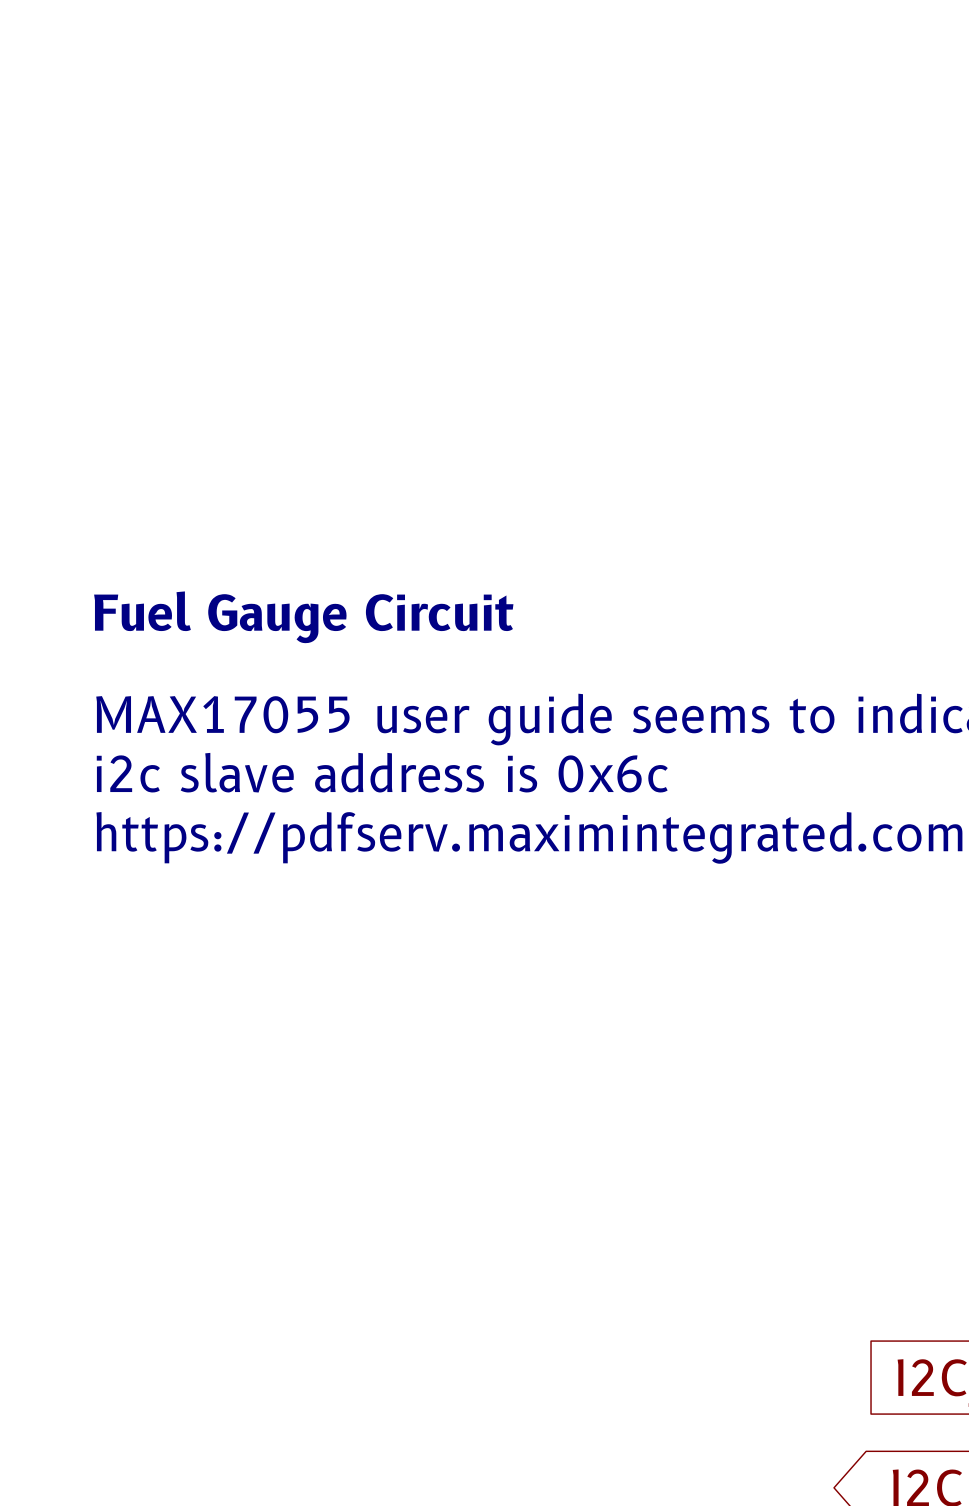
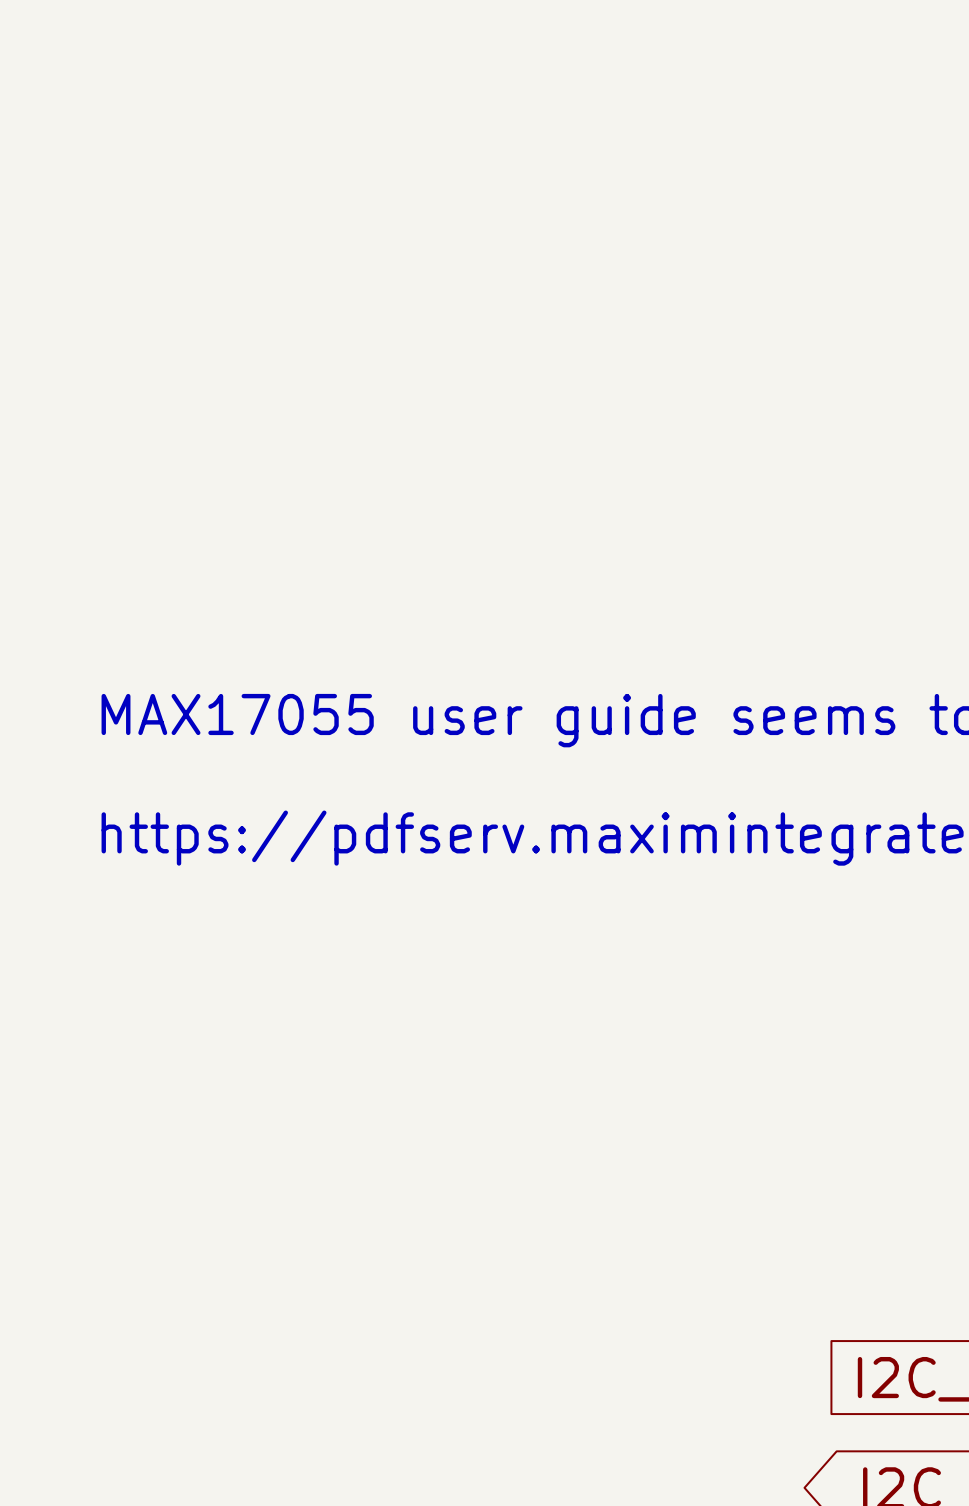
text: Fuel Gauge Circuit (303, 617) -> none
text: i2c slave address is 0x6c (382, 772) -> none

